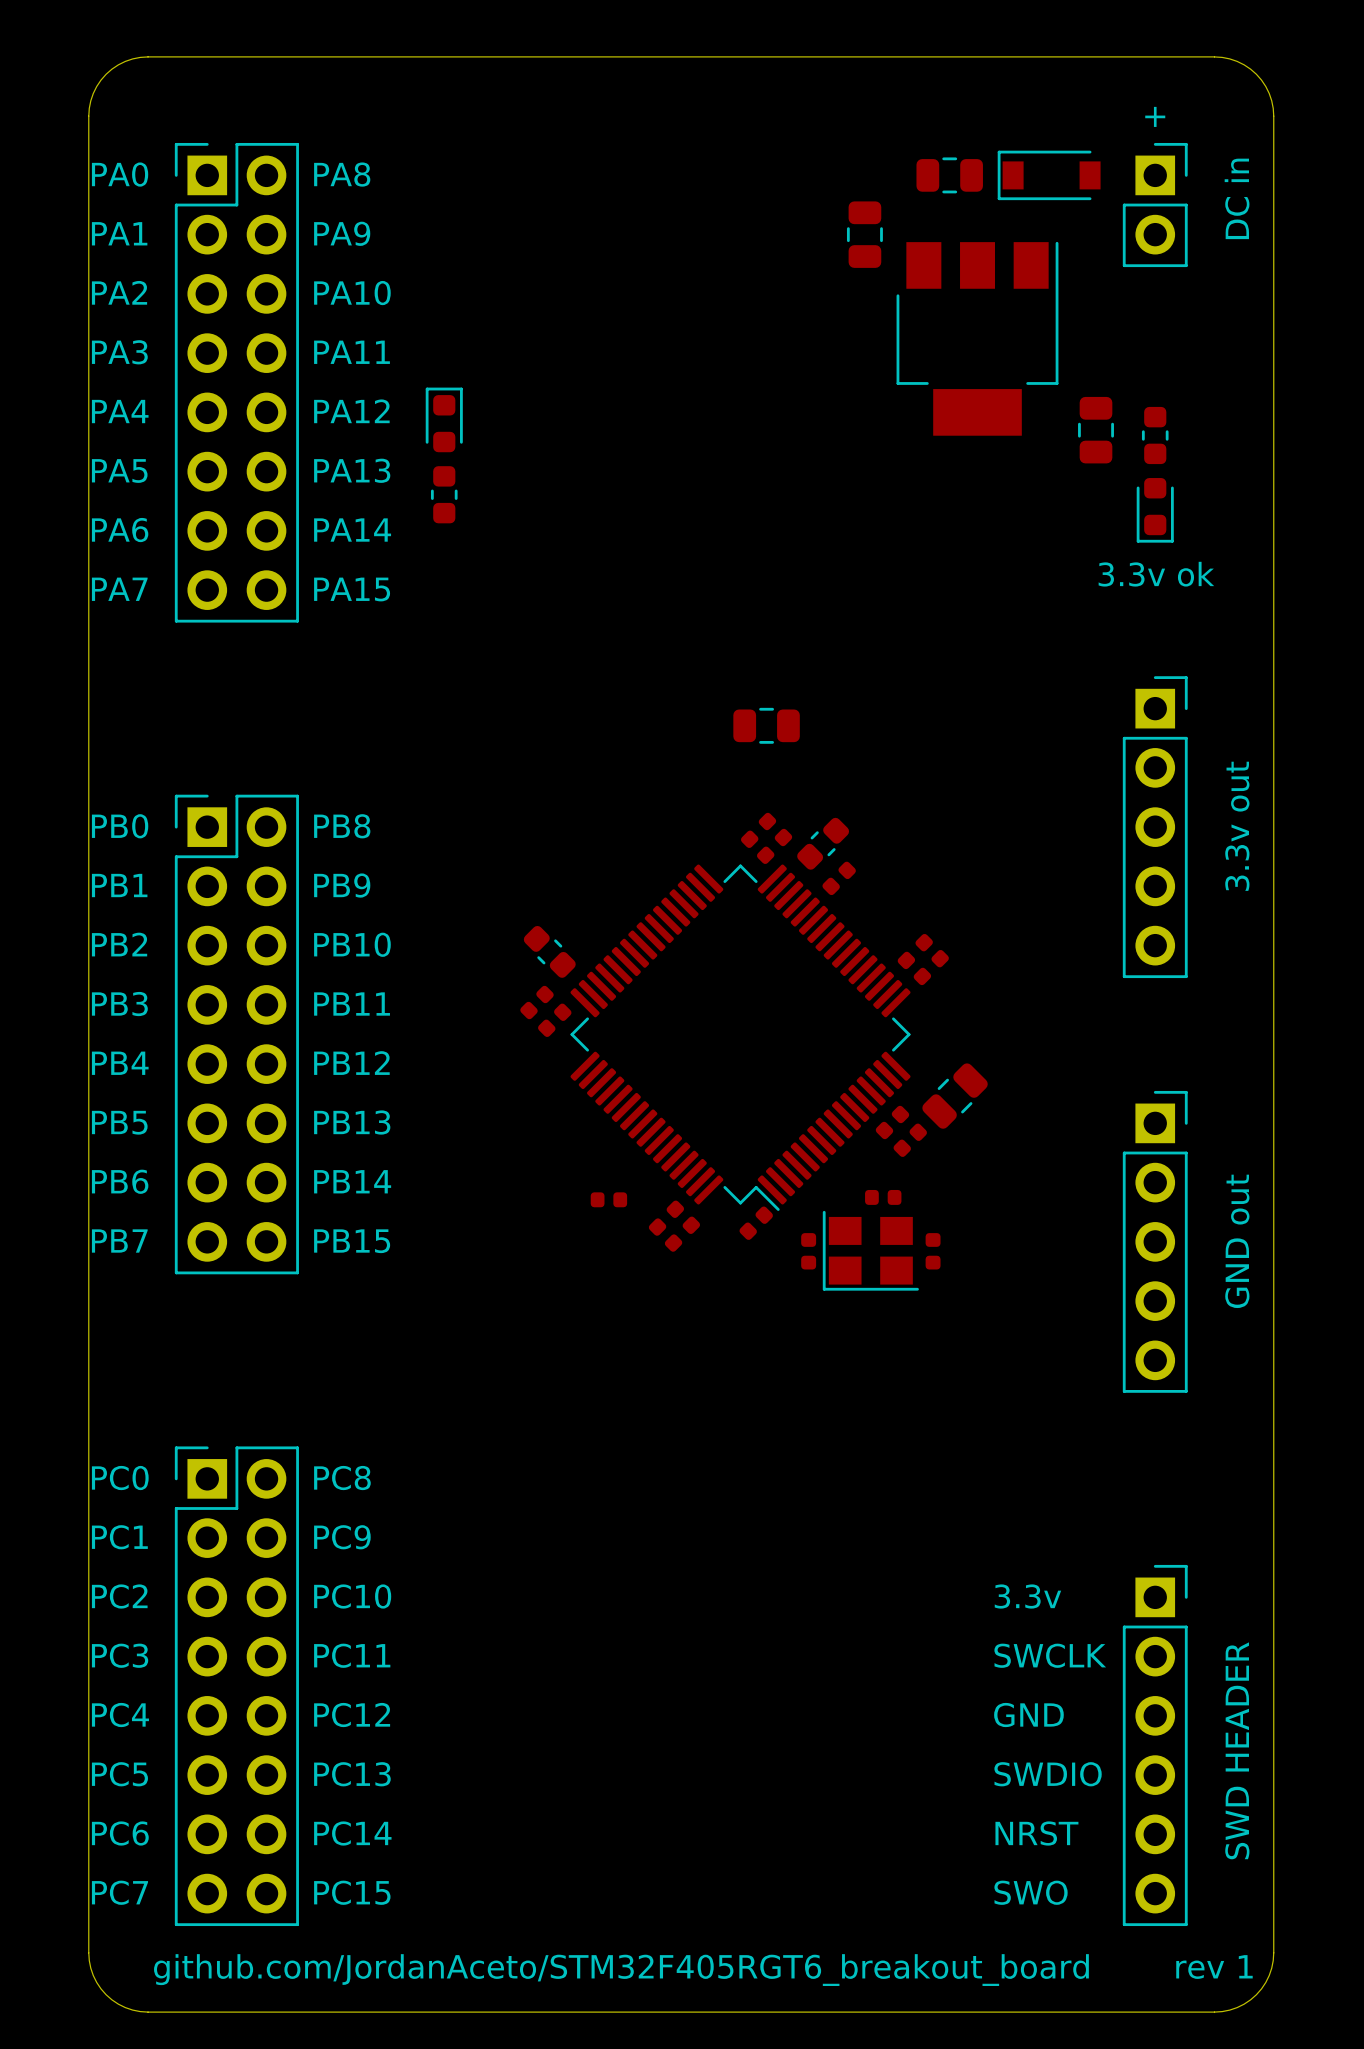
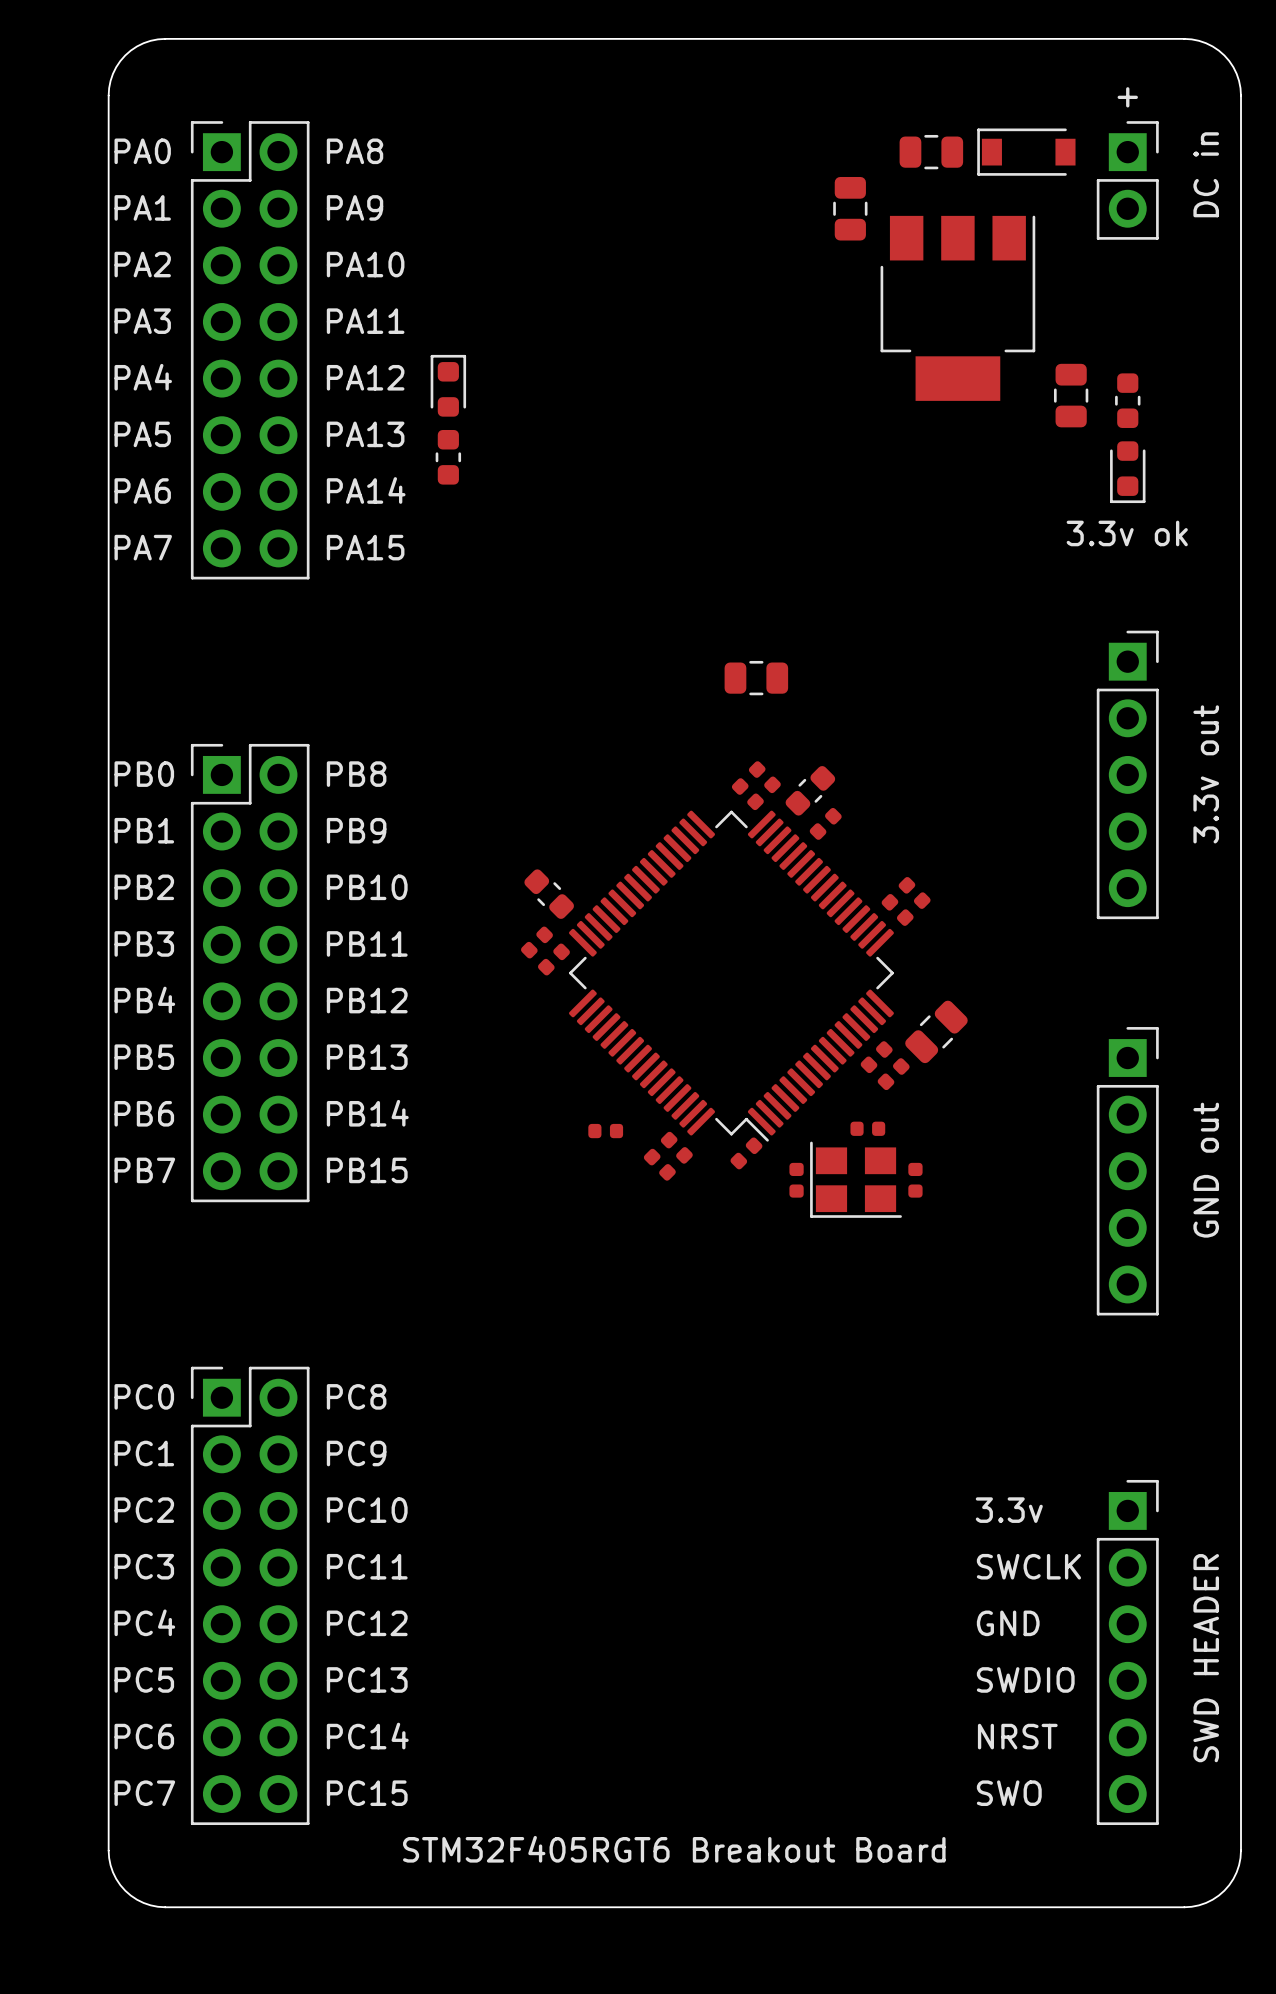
text: rev 1 (1214, 1967) -> none
text: github.com/JordanAceto/STM32F405RGT6_breakout_board (621, 1970) -> STM32F405RGT6 Breakout Board (674, 1849)

